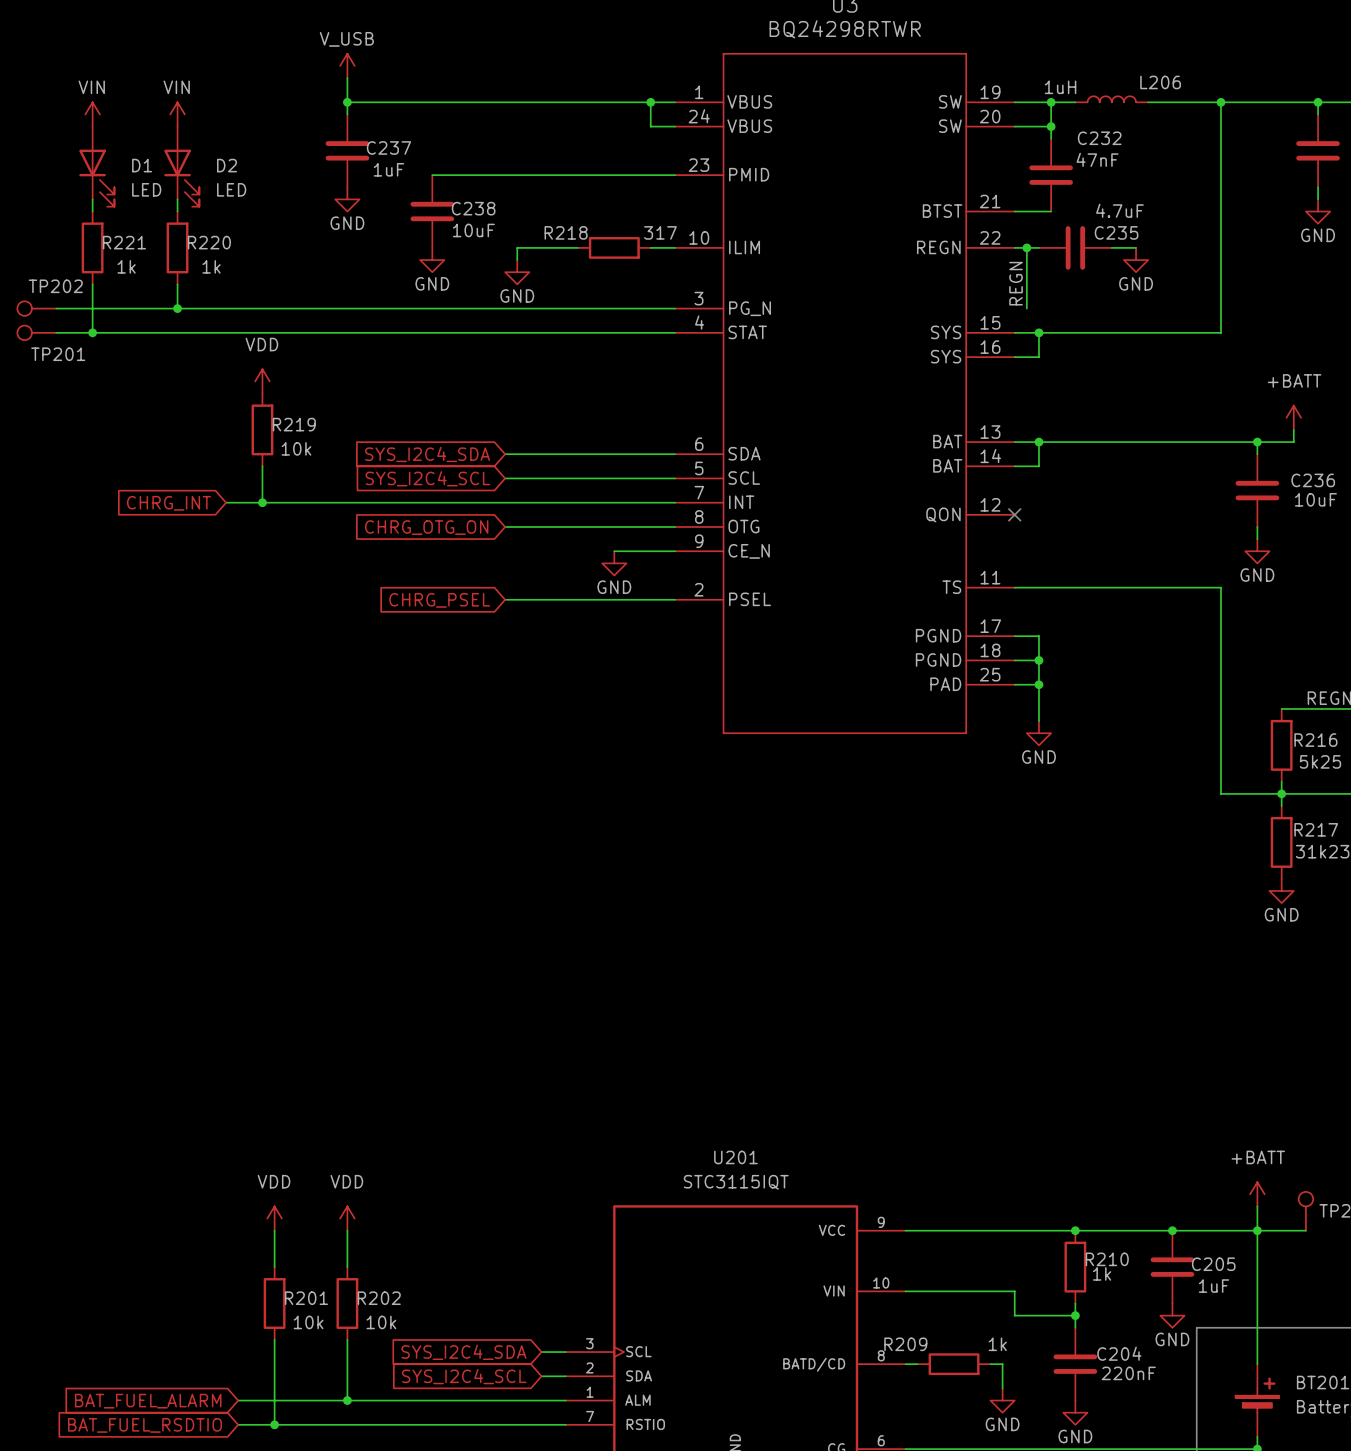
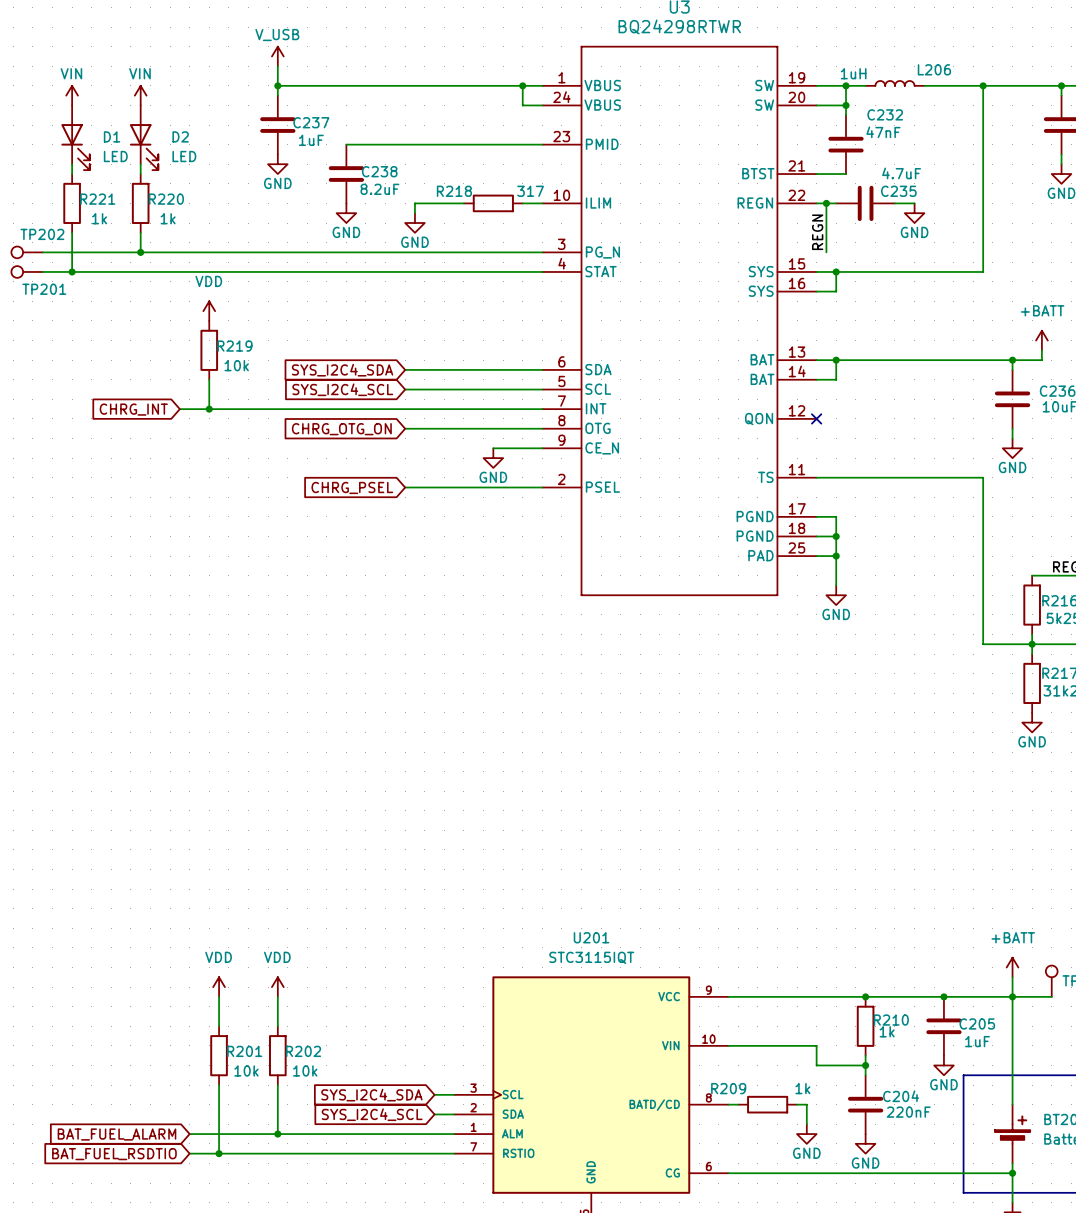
C238 value: 10uF (473, 230) -> 8.2uF (379, 189)

